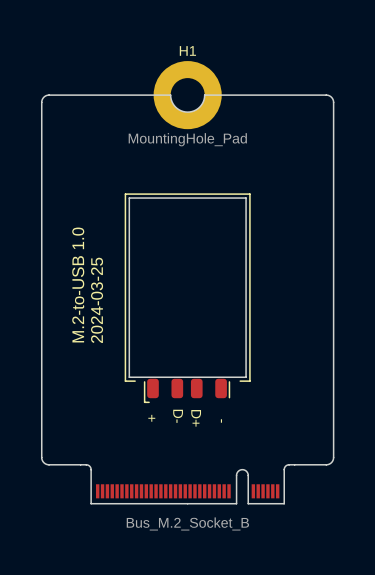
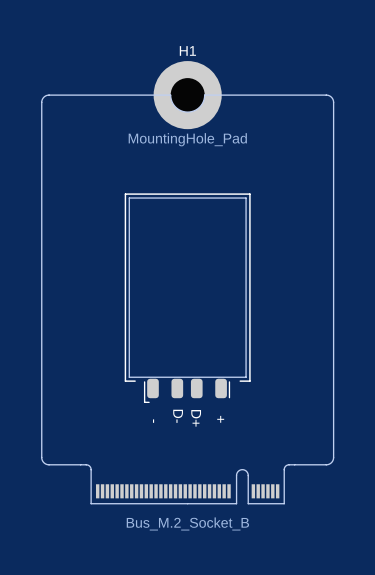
text: M.2-to-USB 1.0 (78, 285) -> none
text: 2024-03-25 (97, 300) -> none
text: + (151, 418) -> - (153, 421)
text: - (221, 420) -> + (220, 419)

